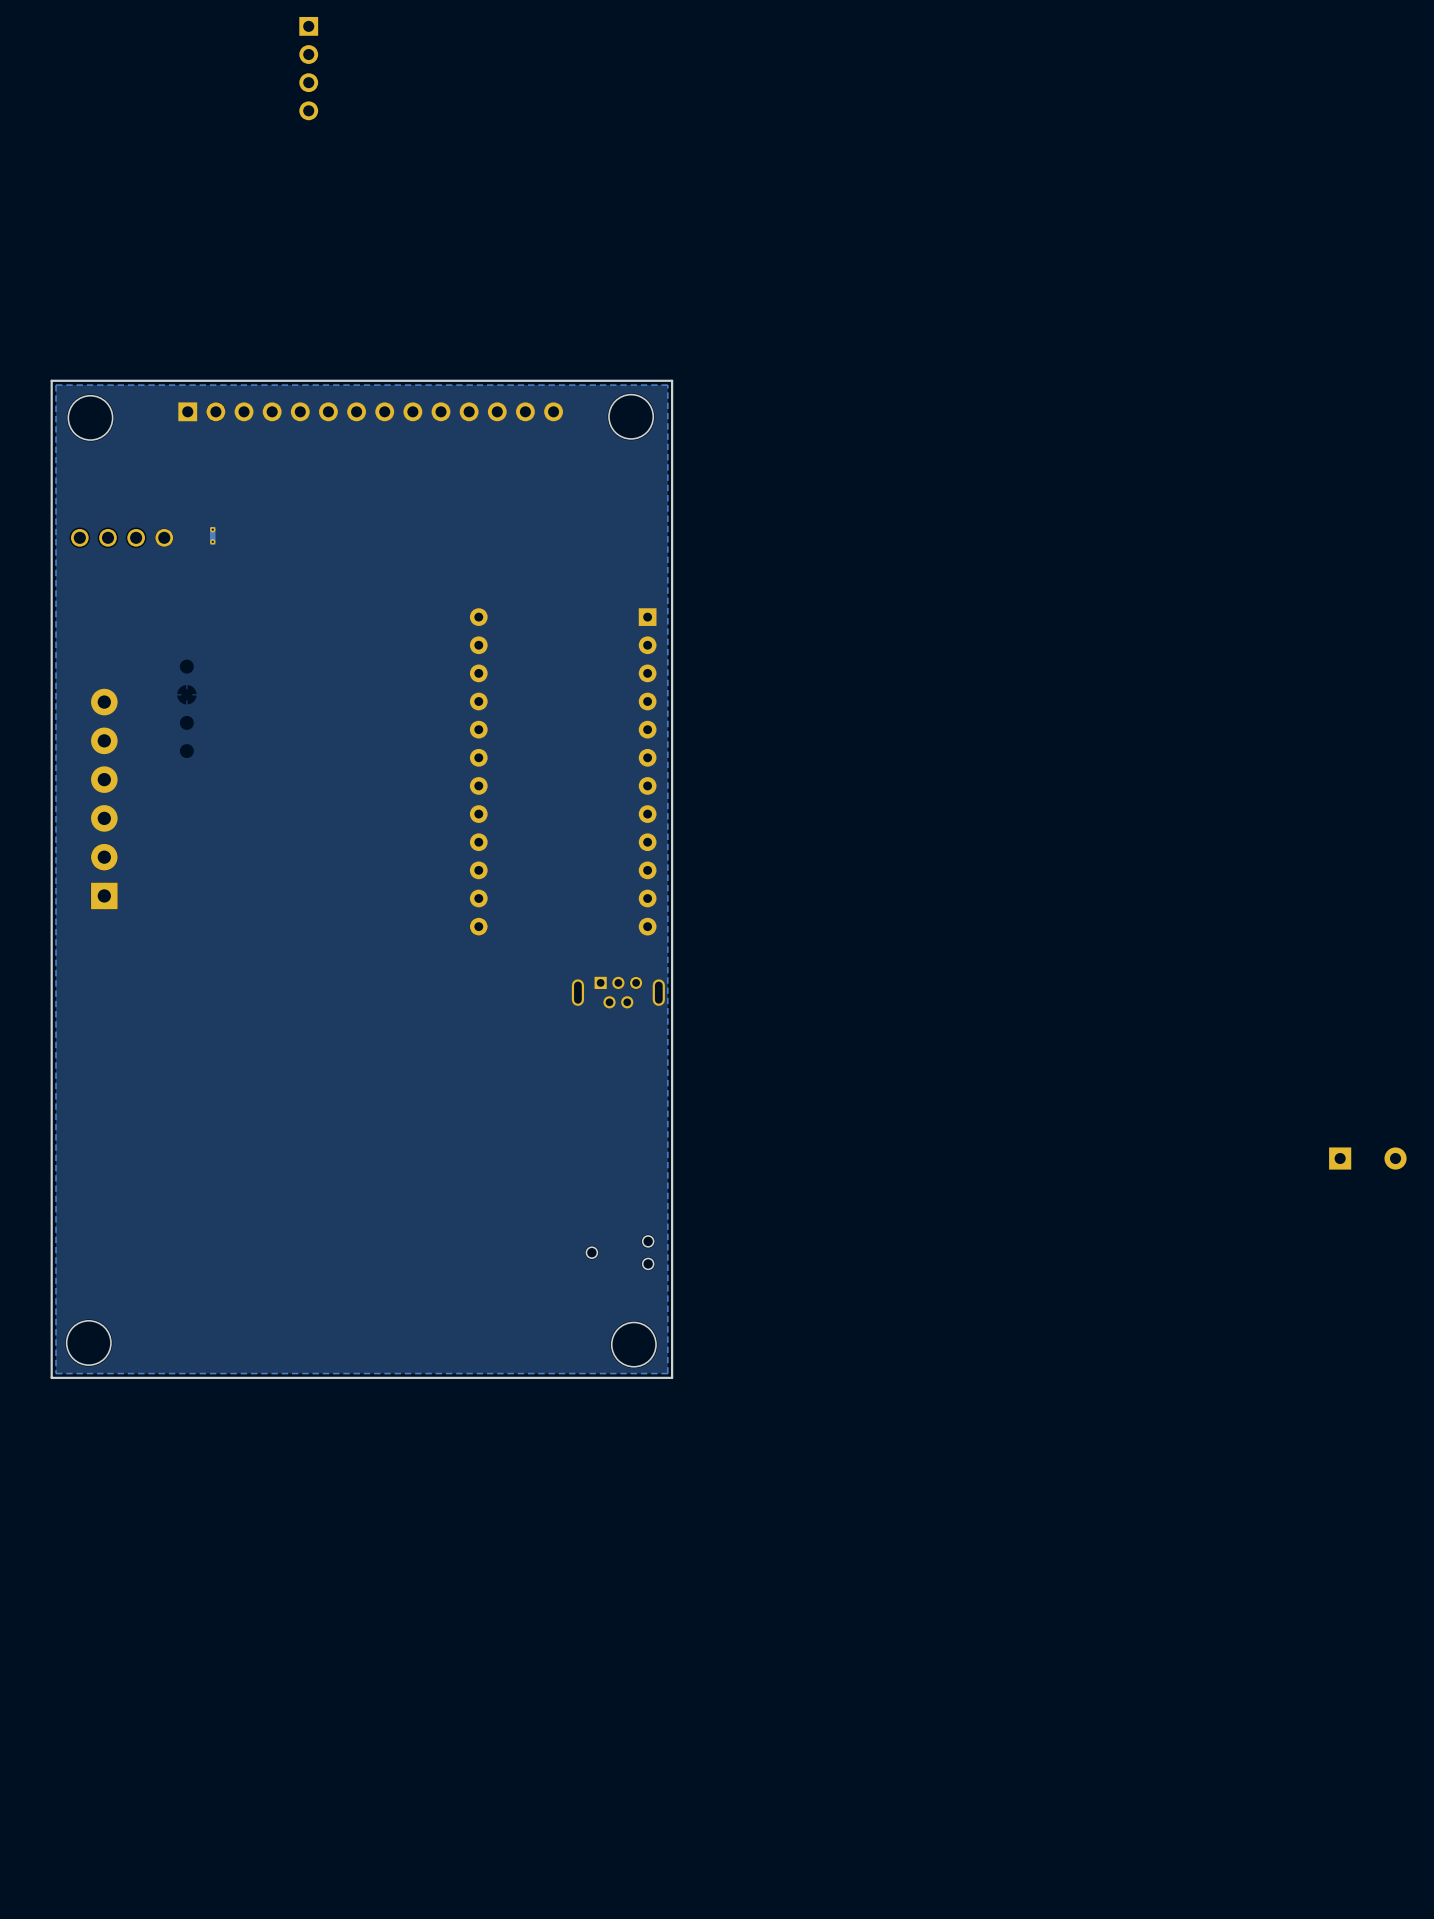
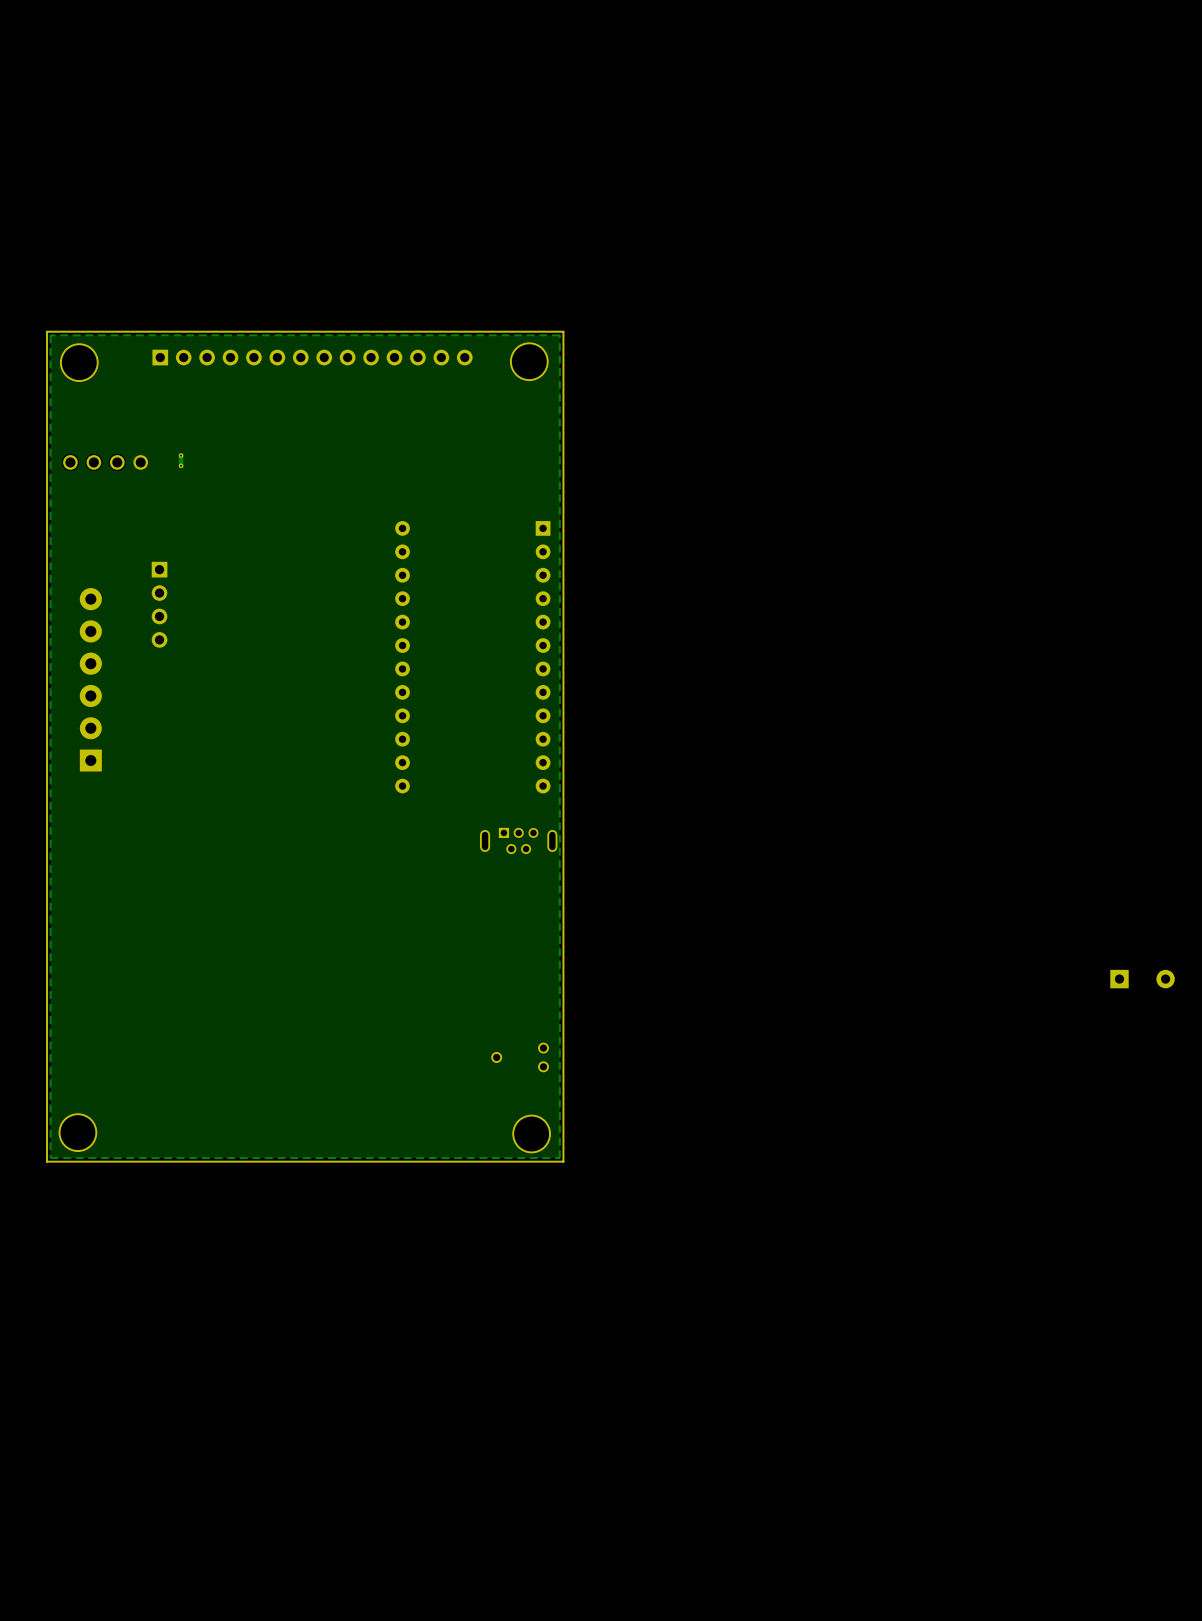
part: (308, 68) -> none
part: none -> (159, 604)

